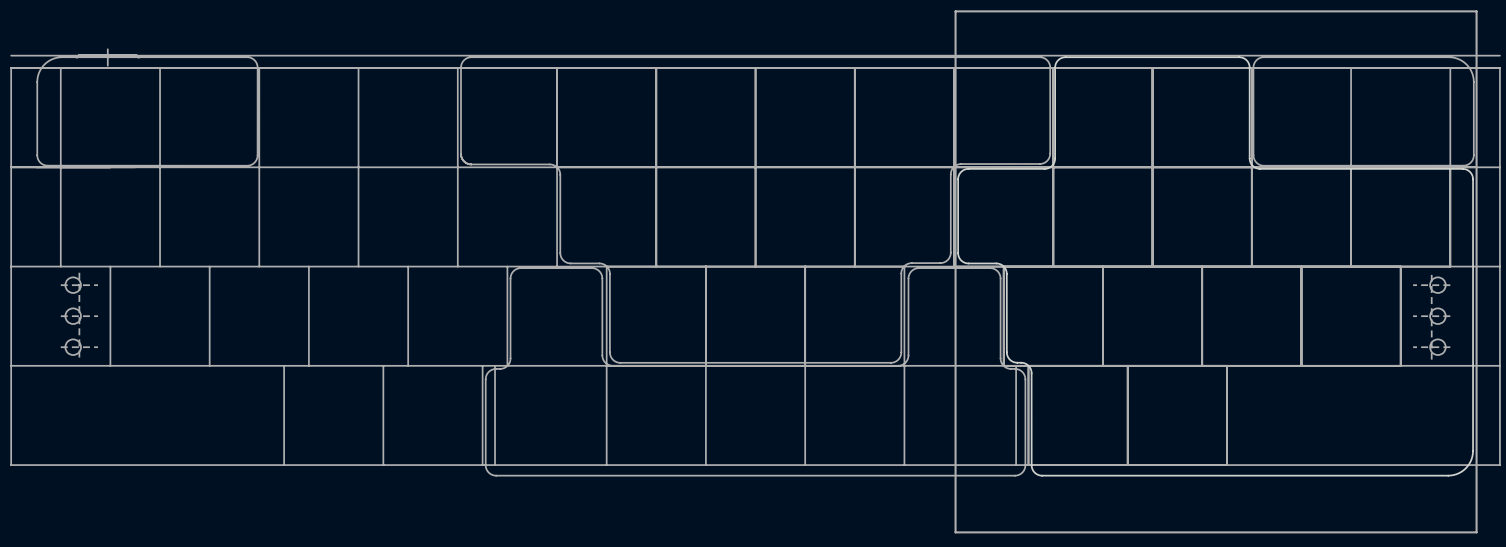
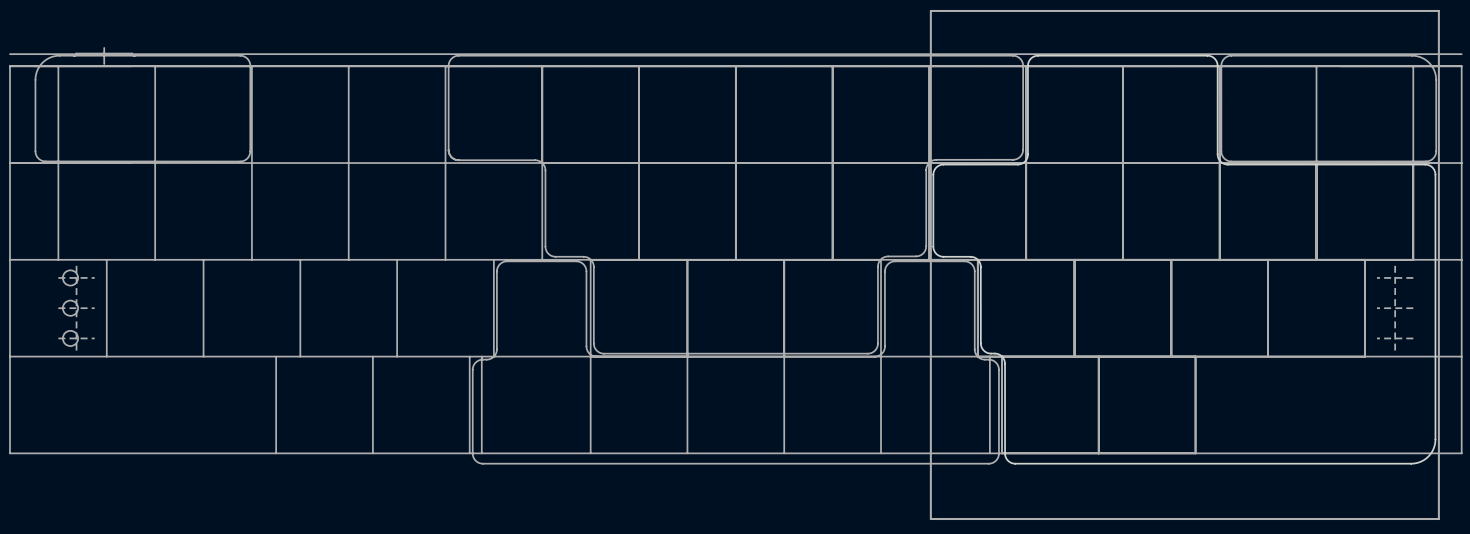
drawing shape: [10, 48, 1501, 477] -> [9, 47, 1463, 465]

